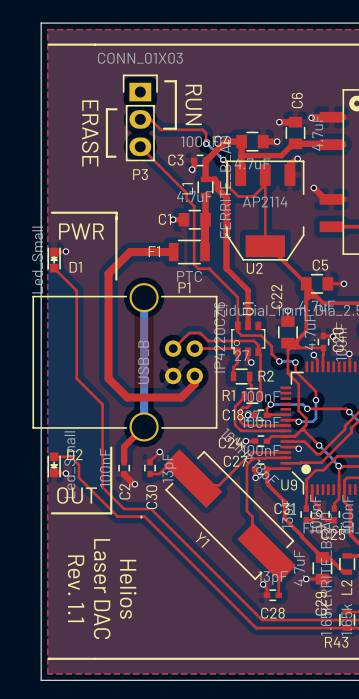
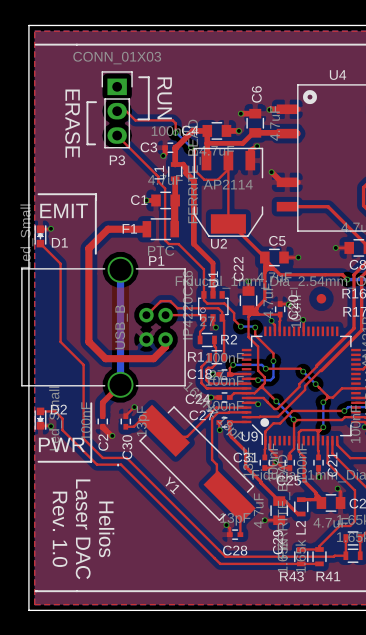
text: none -> EMIT (64, 210)
text position: PWR (81, 231) -> PWR (61, 444)
text: OUT (77, 495) -> none
text: Rev. 1.1 (76, 588) -> Rev. 1.0 (60, 529)

